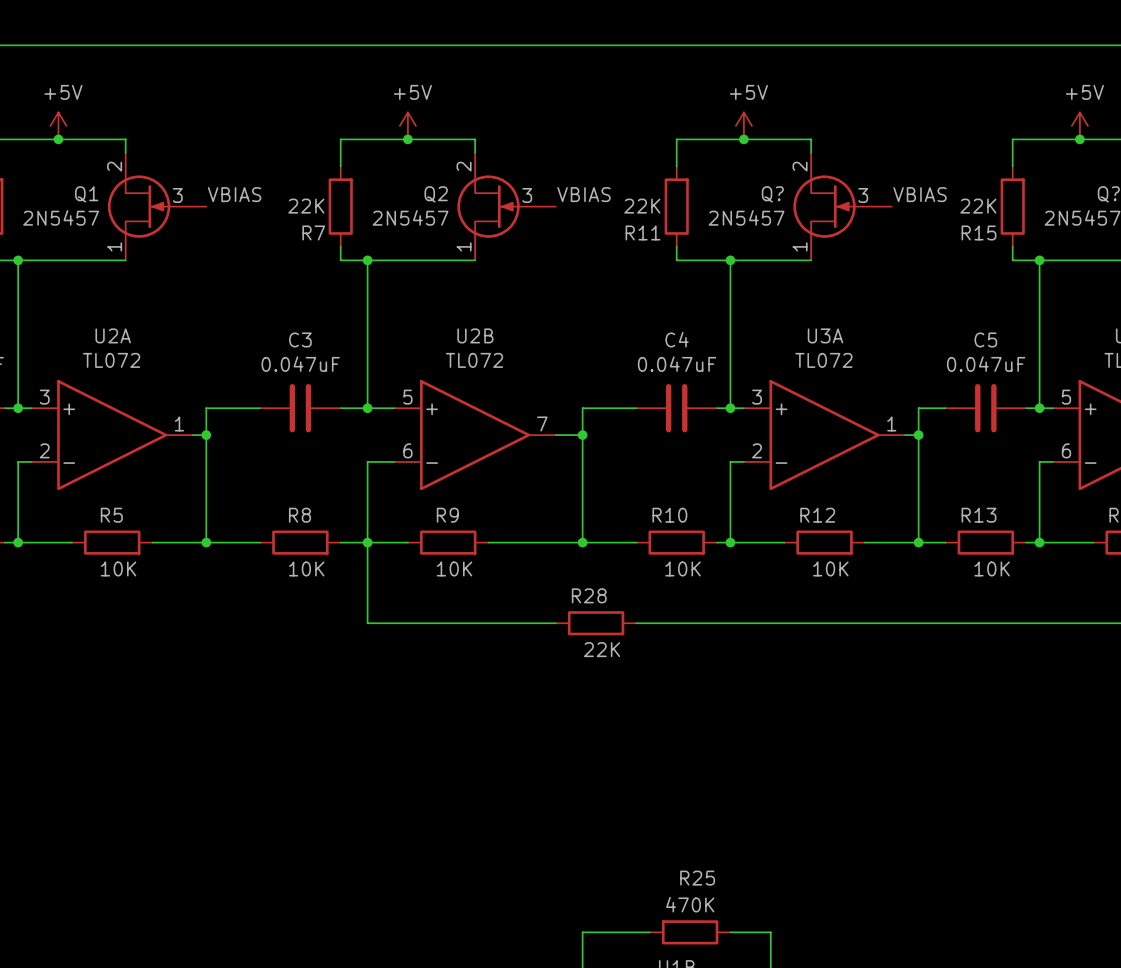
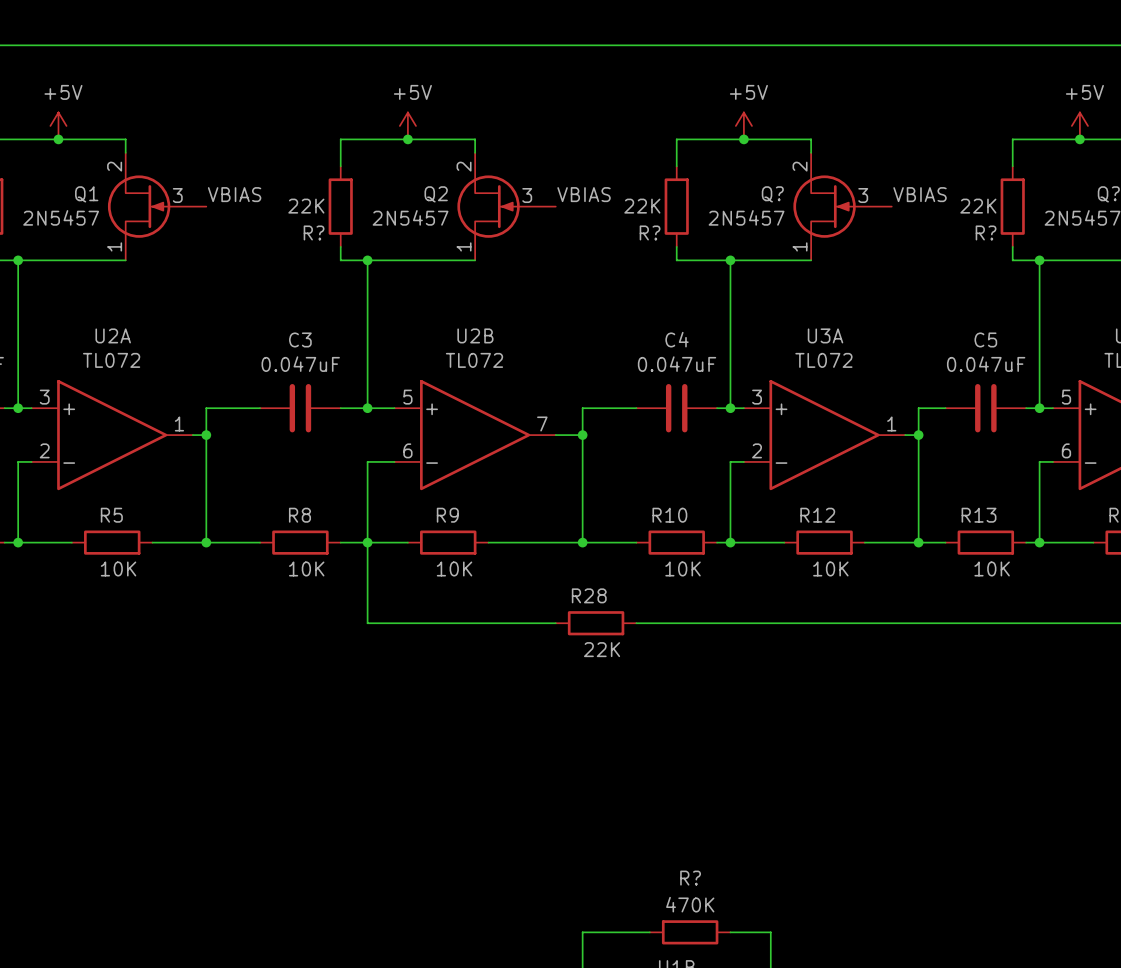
R7 name: R7 (313, 232) -> R? (314, 232)
R11 name: R11 (643, 232) -> R? (650, 232)
R15 name: R15 (979, 232) -> R? (986, 232)
R25 name: R25 (697, 878) -> R? (690, 878)

